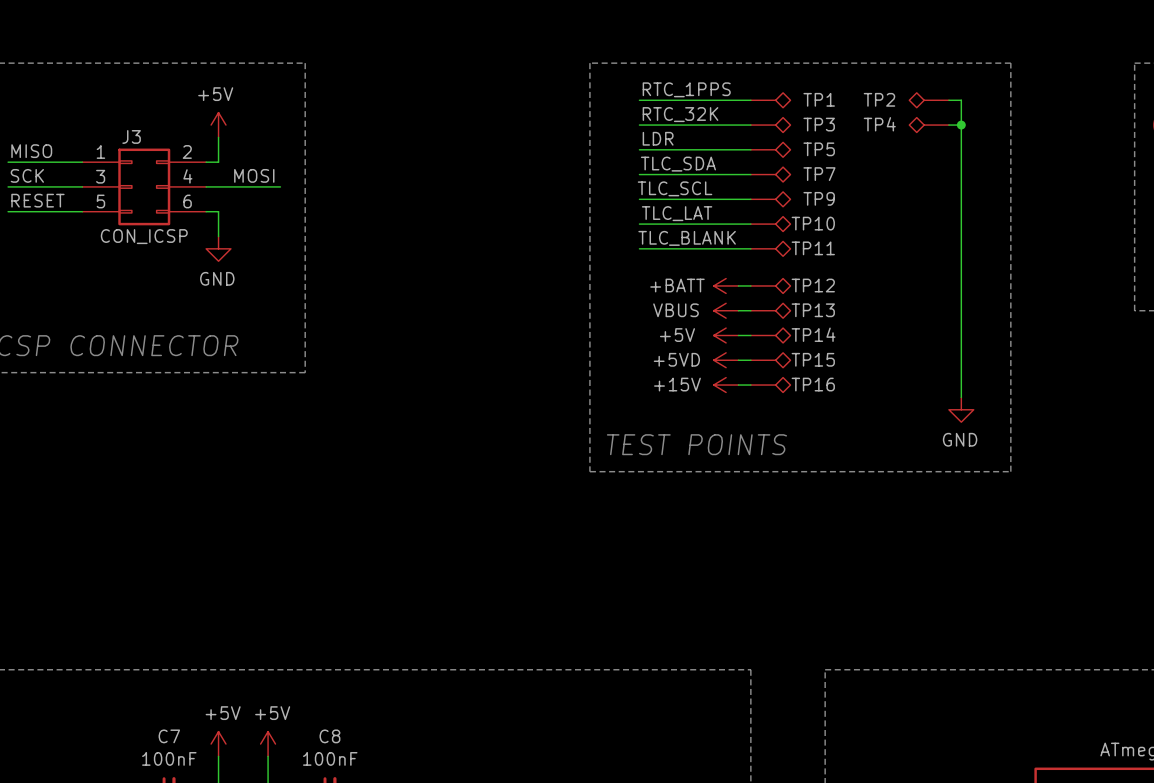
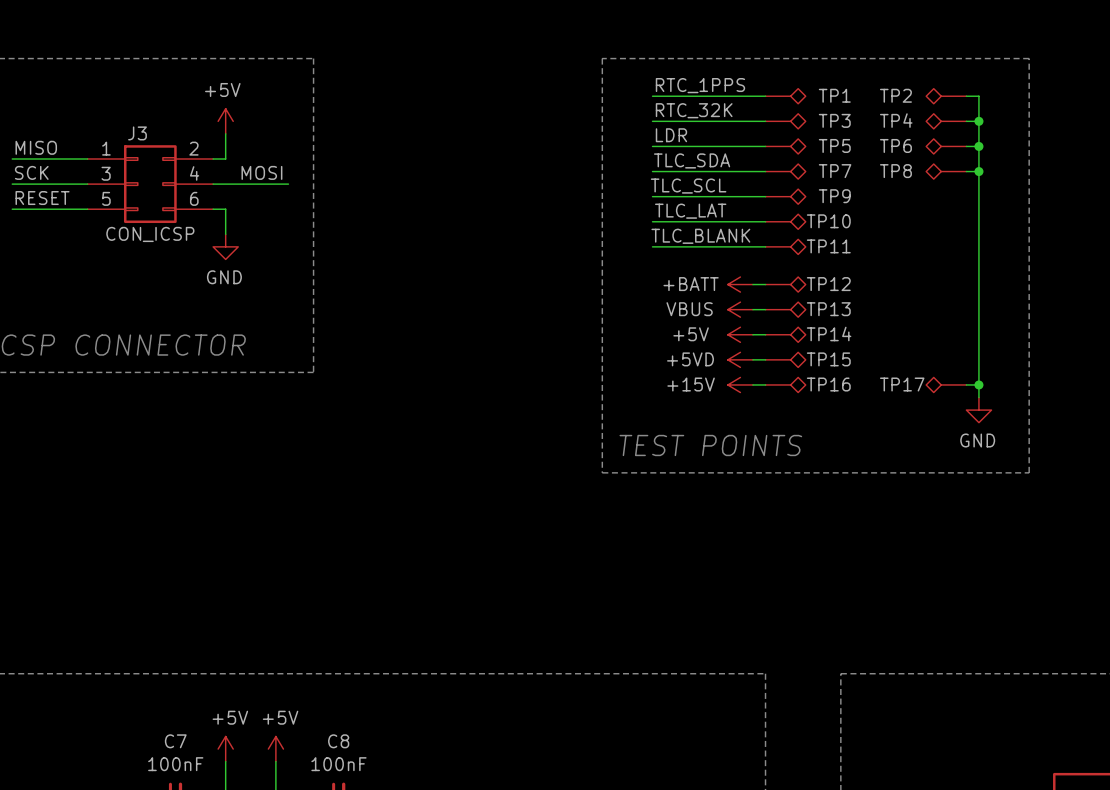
TP6: none -> (946, 146)
wire: none -> (966, 146) (978, 146)
junction: none -> (978, 146)
TP8: none -> (946, 171)
wire: none -> (966, 171) (978, 171)
junction: none -> (978, 171)
TP17: none -> (946, 384)
wire: none -> (966, 384) (978, 384)
junction: none -> (978, 384)

